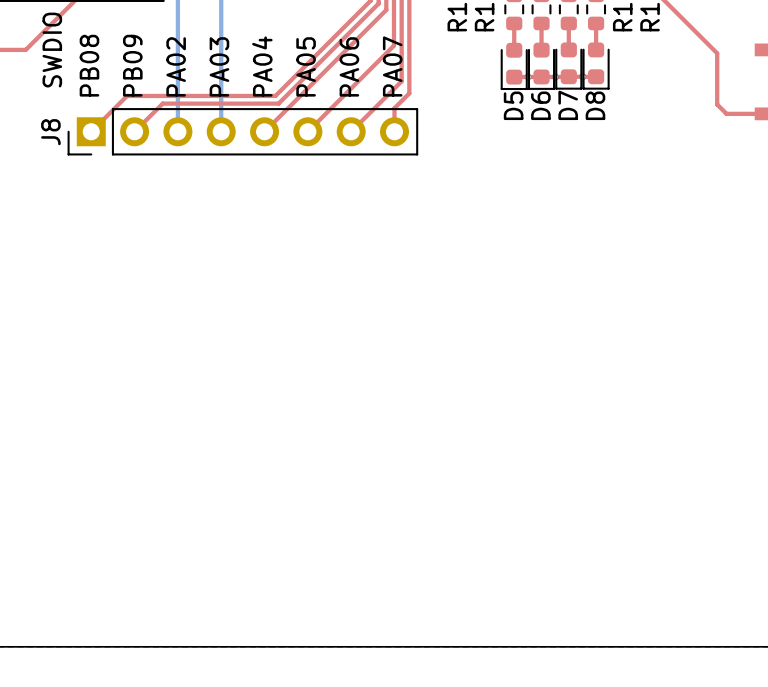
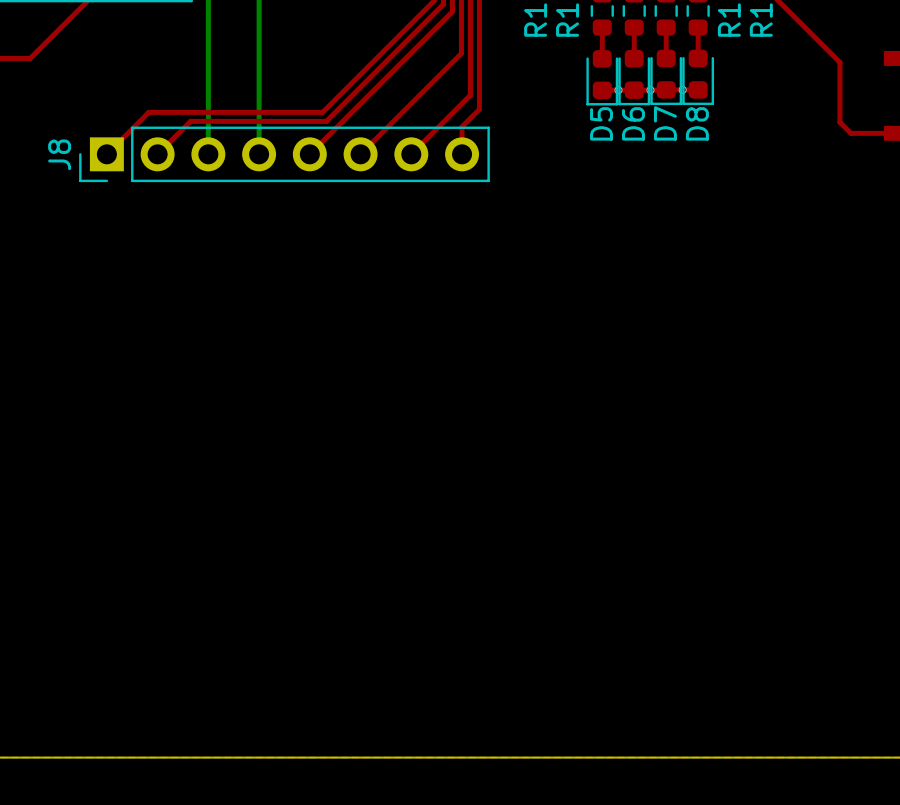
text: SWDIO (52, 50) -> none
text: PB08 (89, 65) -> none
text: PB09 (132, 65) -> none
text: PA02 (176, 66) -> none
text: PA03 (219, 66) -> none
text: PA04 (262, 66) -> none
text: PA05 (306, 66) -> none
text: PA06 (349, 66) -> none
text: PA07 (392, 66) -> none

